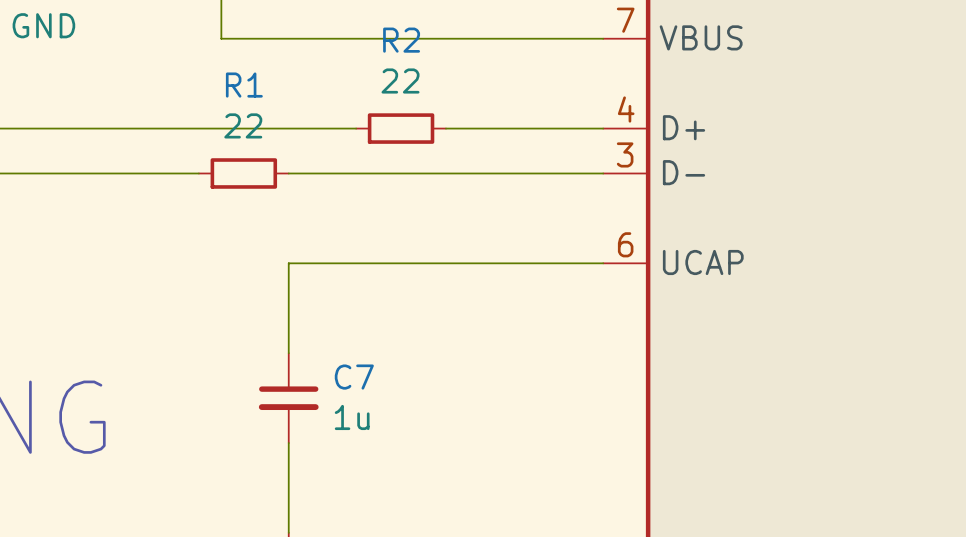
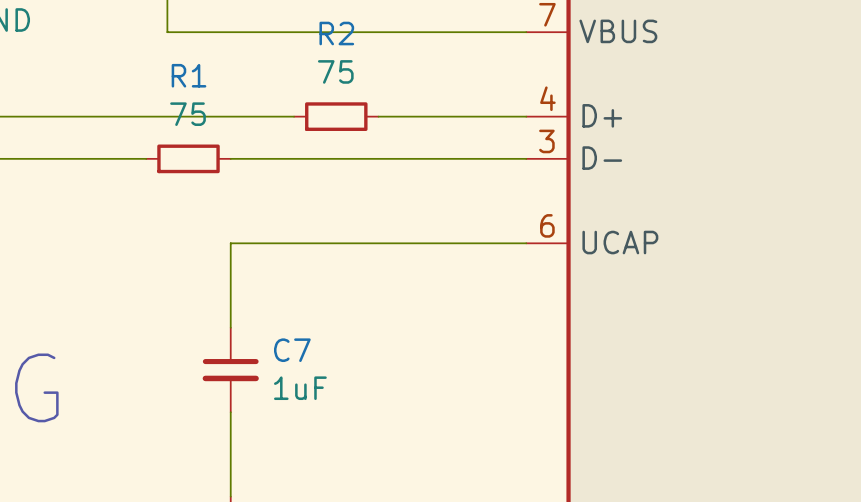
R2 value: 22 (400, 81) -> 75 (335, 71)
R1 value: 22 (243, 125) -> 75 (188, 114)
C7 value: 1u (352, 417) -> 1uF (300, 388)

